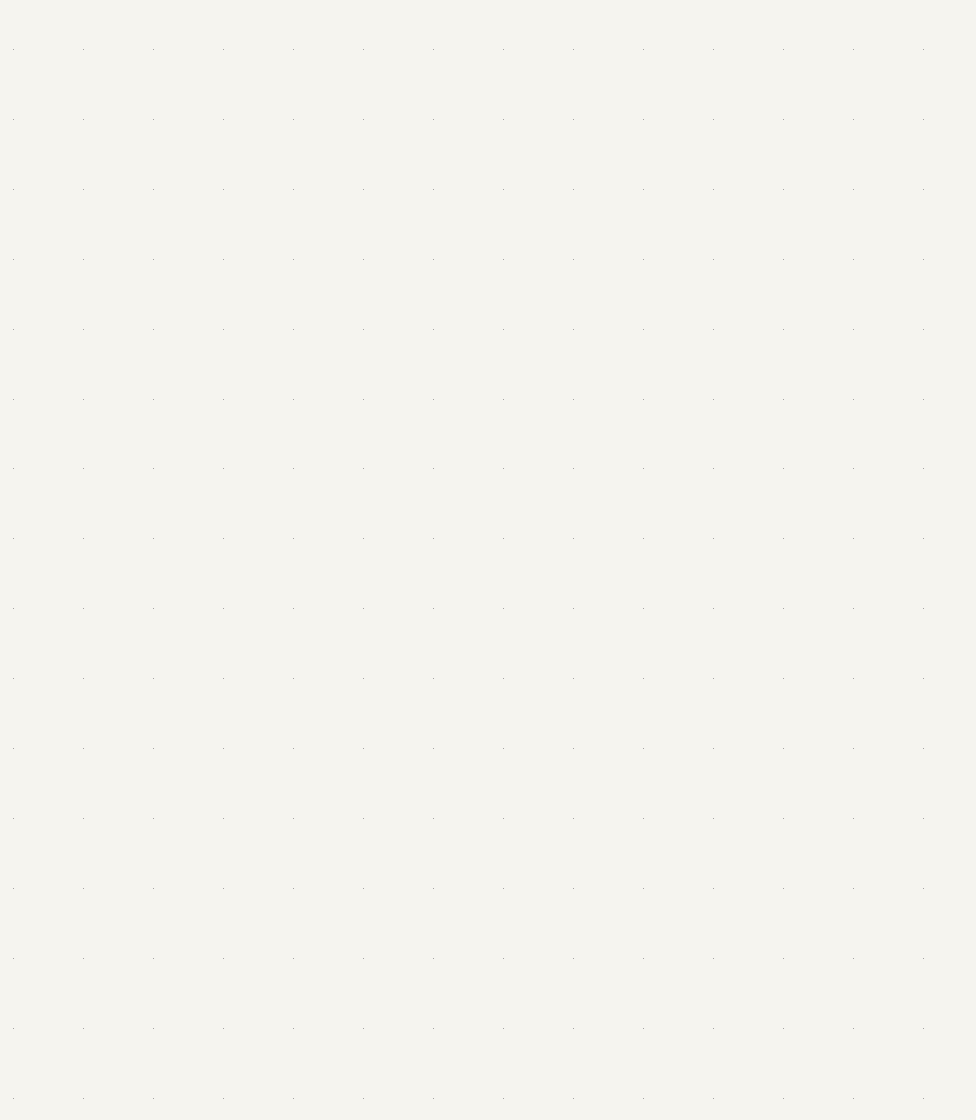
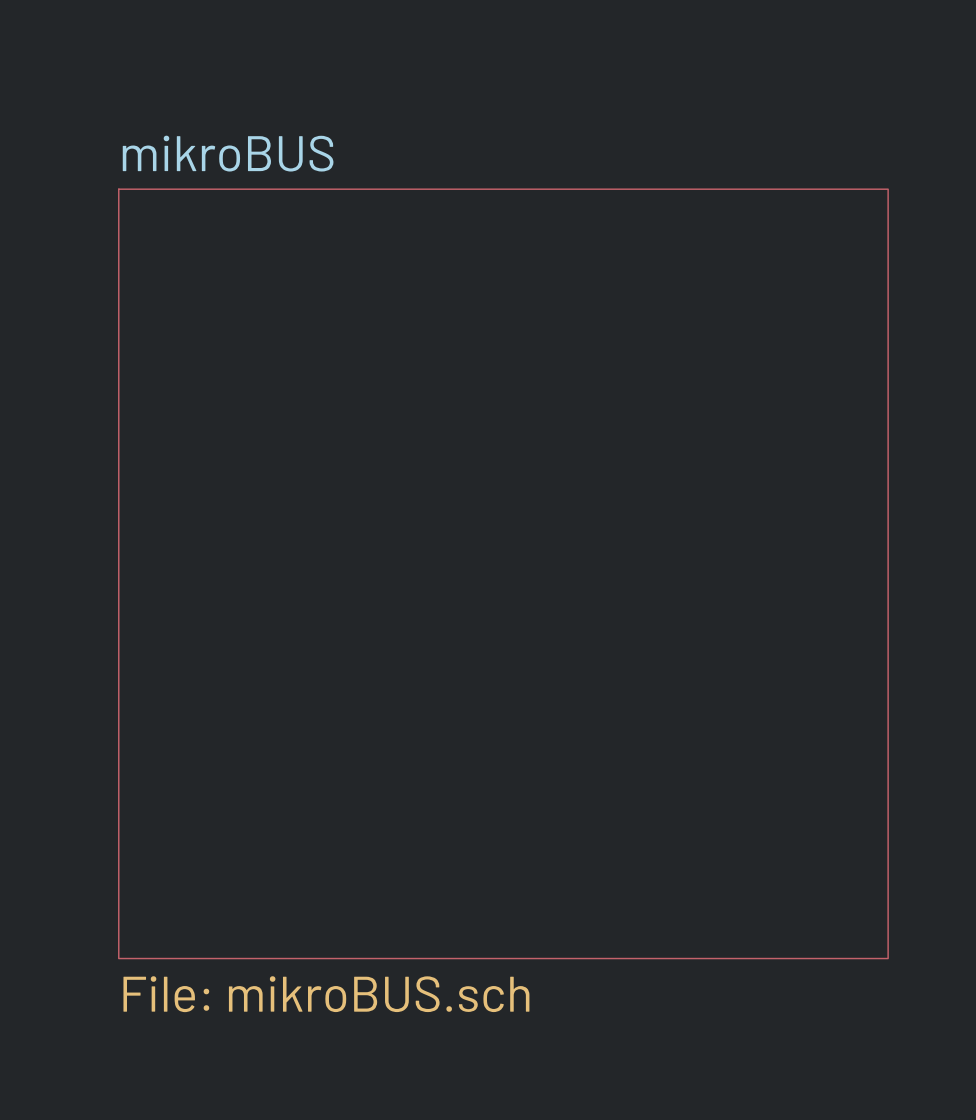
sheet mikroBUS: none -> File: mikroBUS.sch (503, 573)

